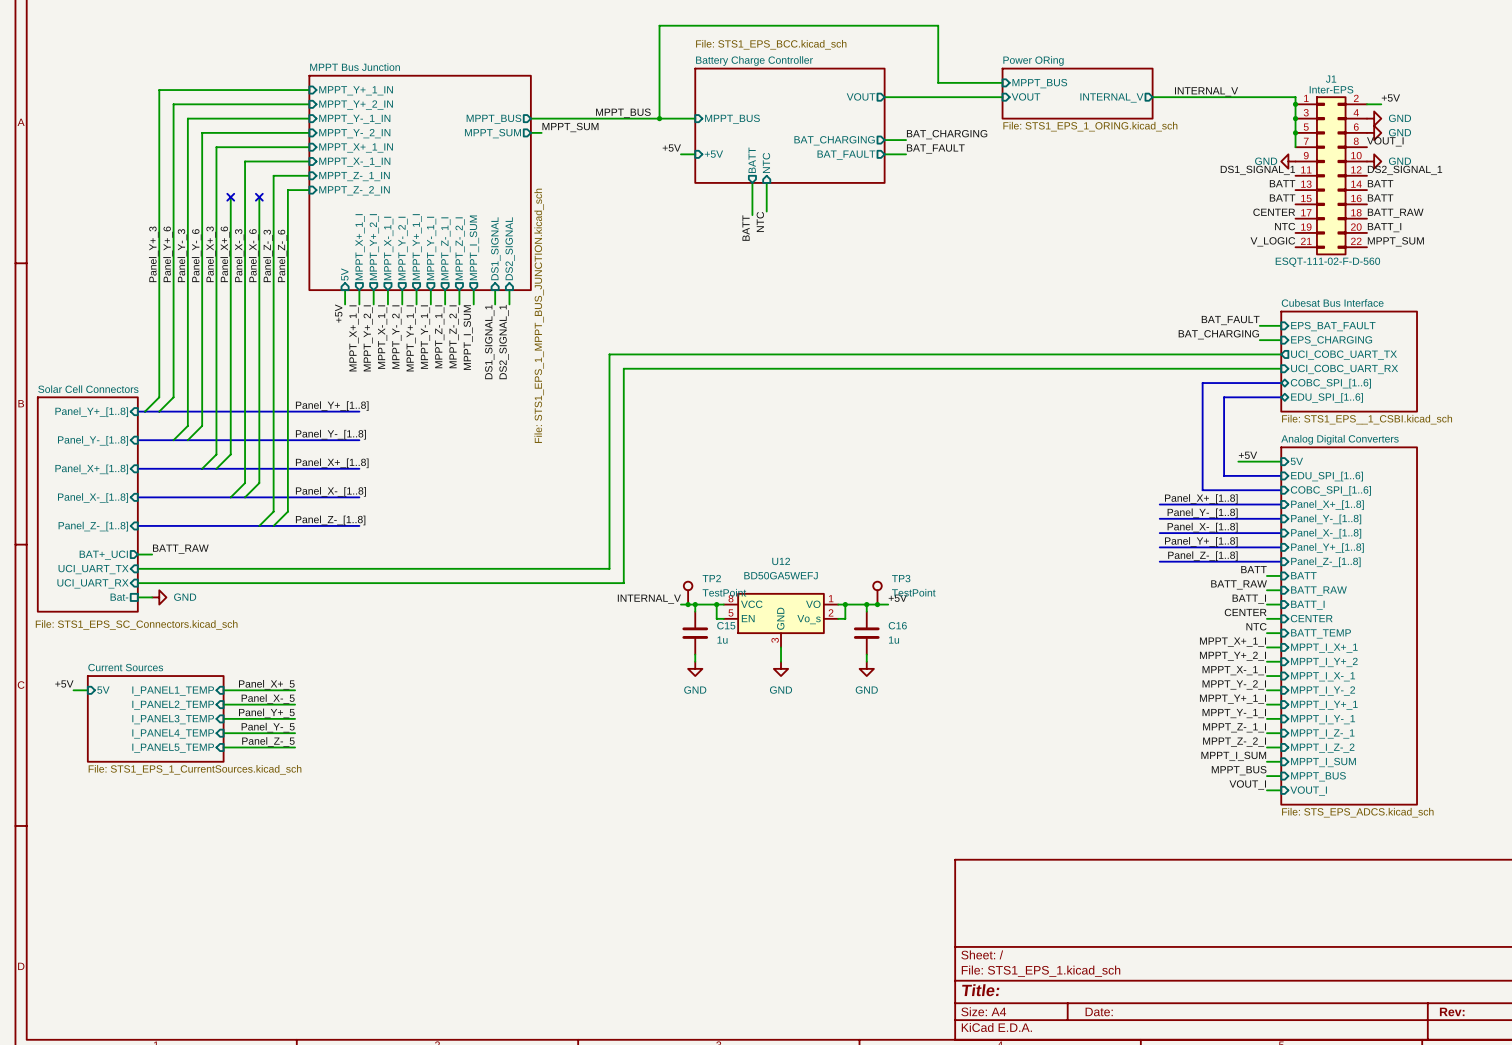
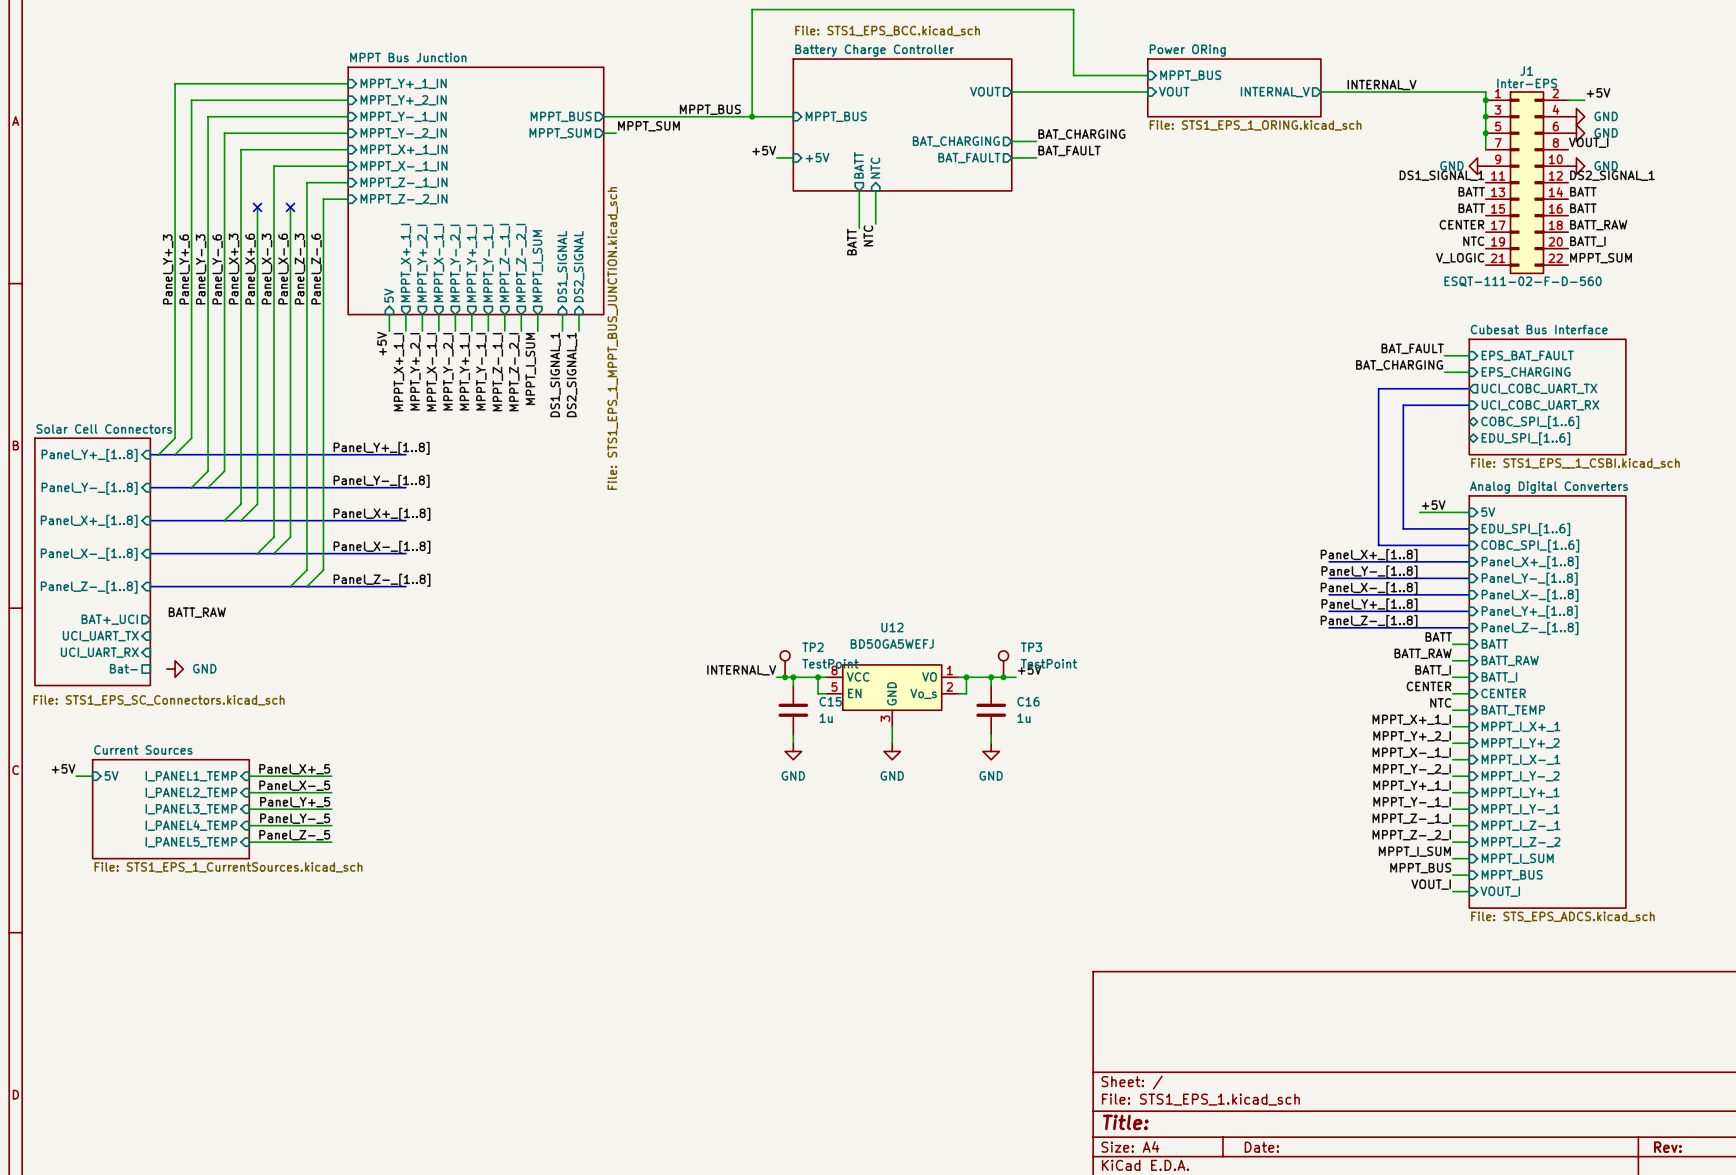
wire: (1281, 354) (609, 354) (609, 568) (137, 568) -> none
wire: (1281, 368) (623, 368) (623, 583) (137, 583) -> none
bus: (1202, 383) (1281, 383) -> (1378, 421) (1378, 388) (1469, 388)
bus: (1224, 397) (1281, 397) -> (1403, 438) (1403, 405) (1469, 405)
wire: (137, 554) (152, 554) -> none
wire: (137, 597) (152, 597) -> none

